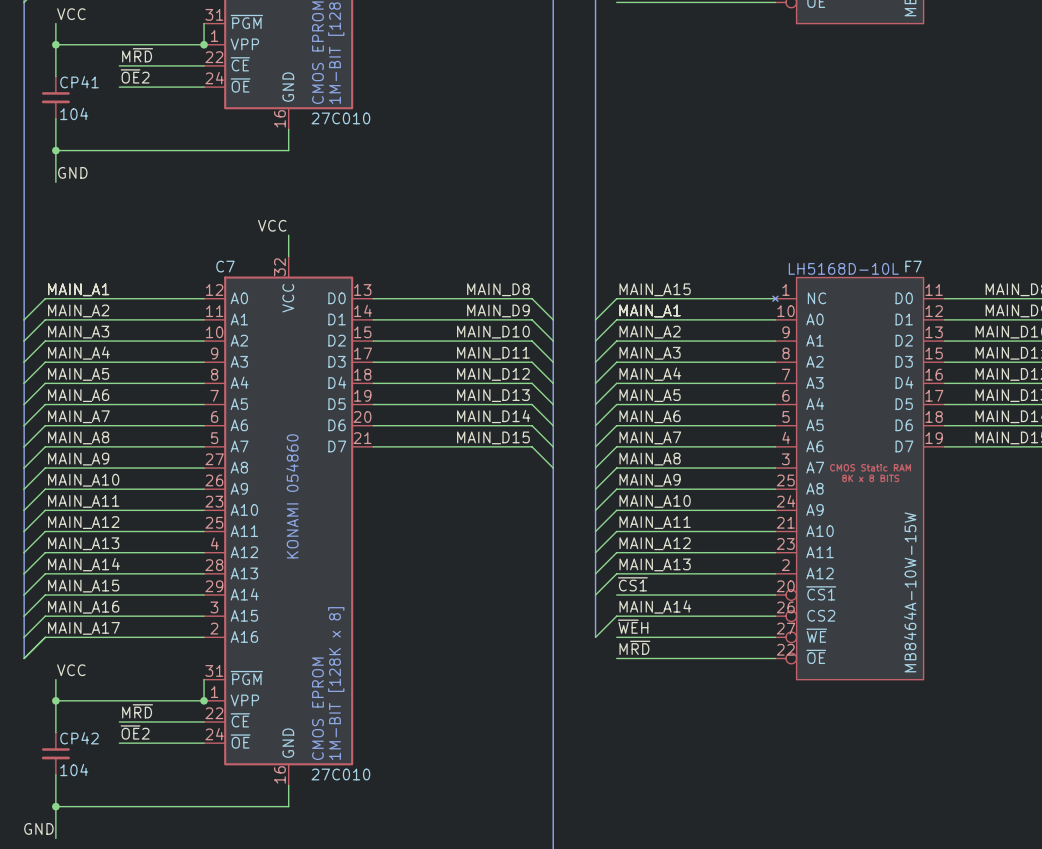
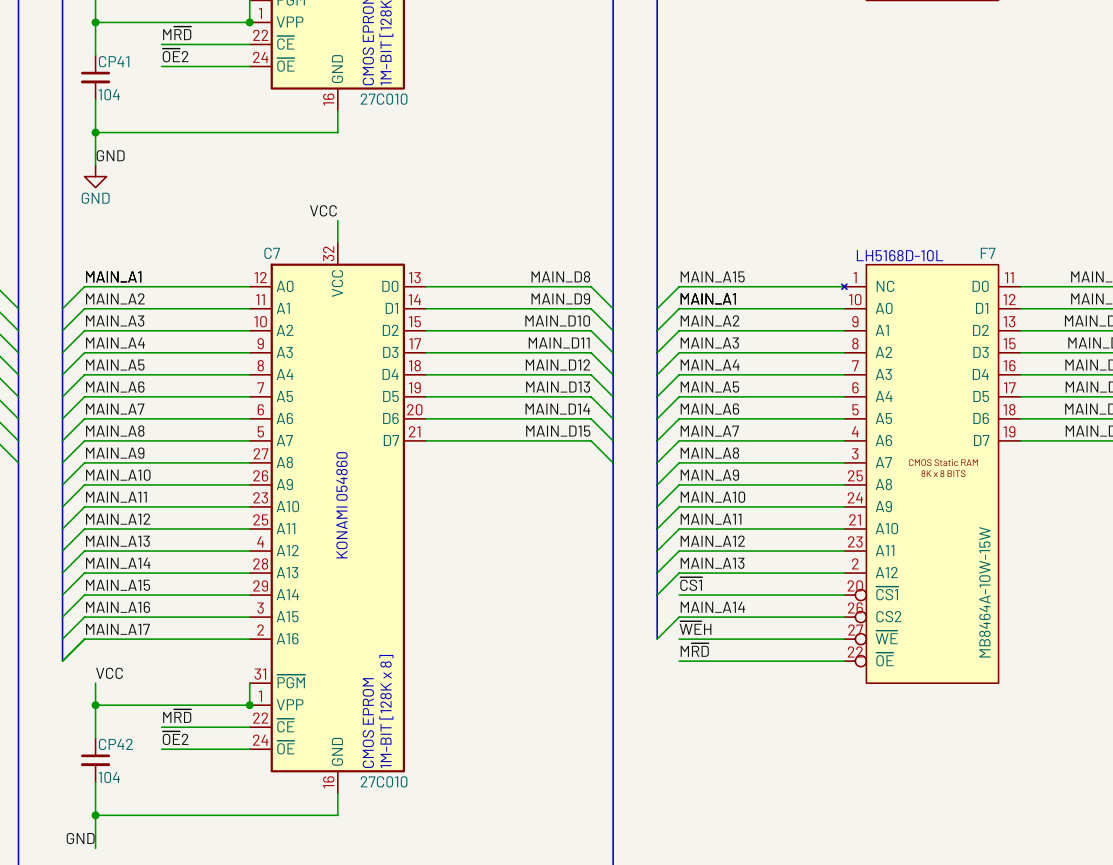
power symbol: none -> GND (95, 176)

